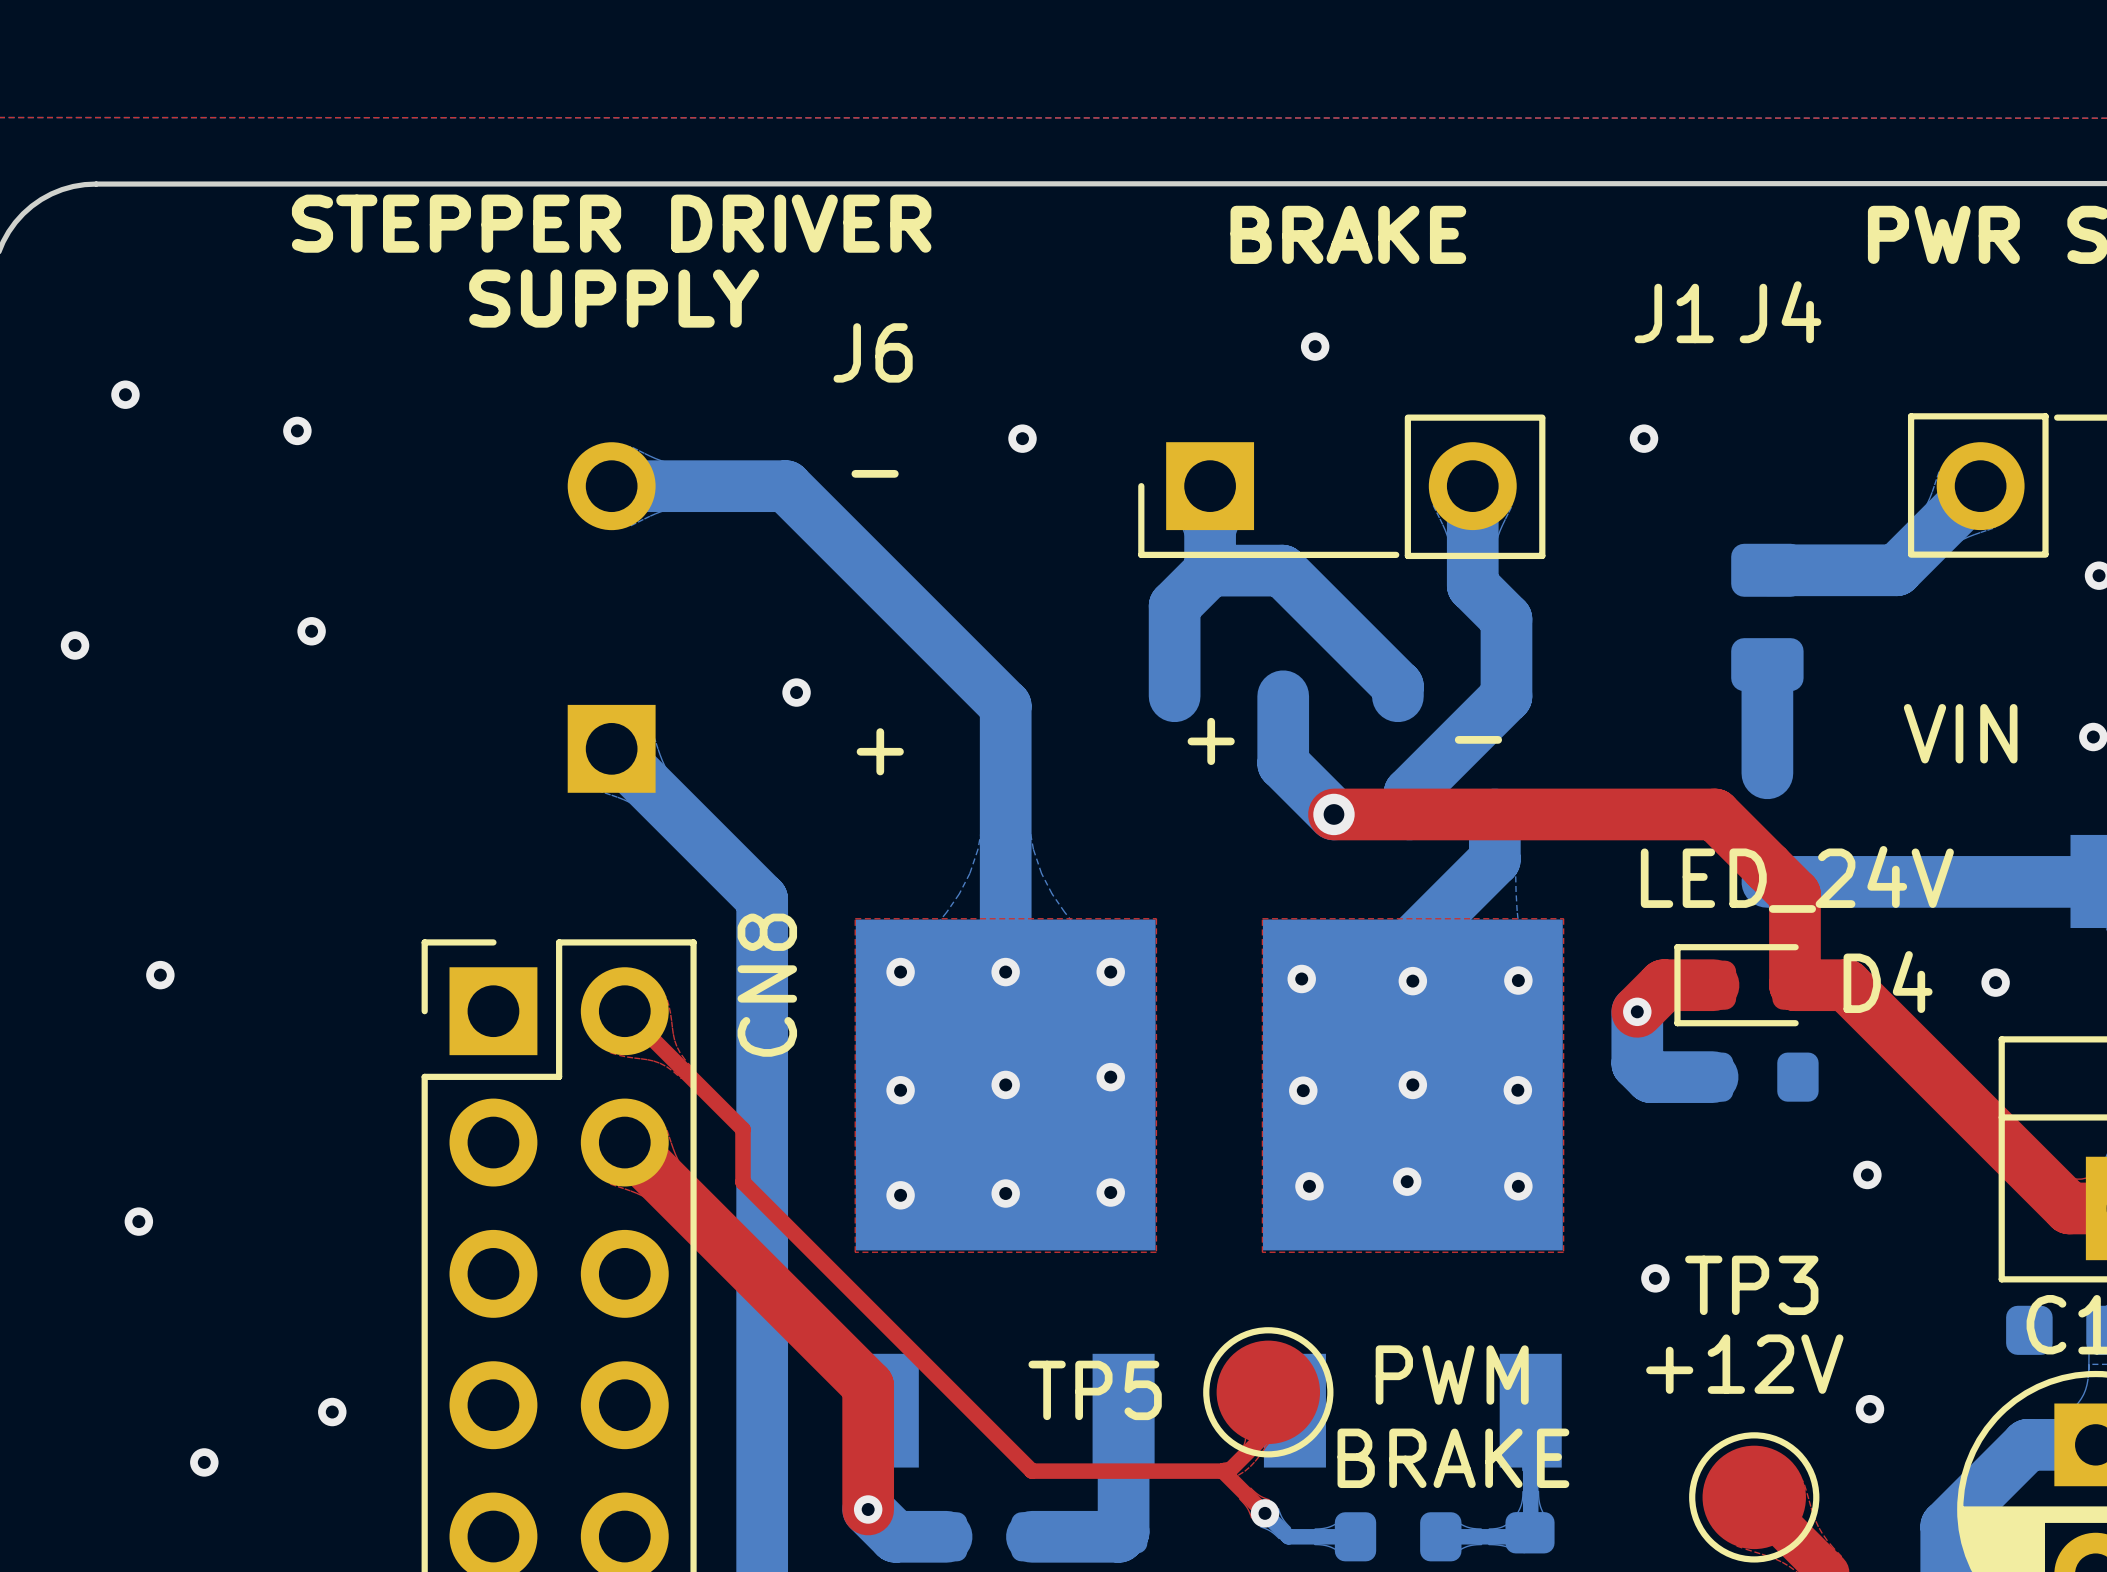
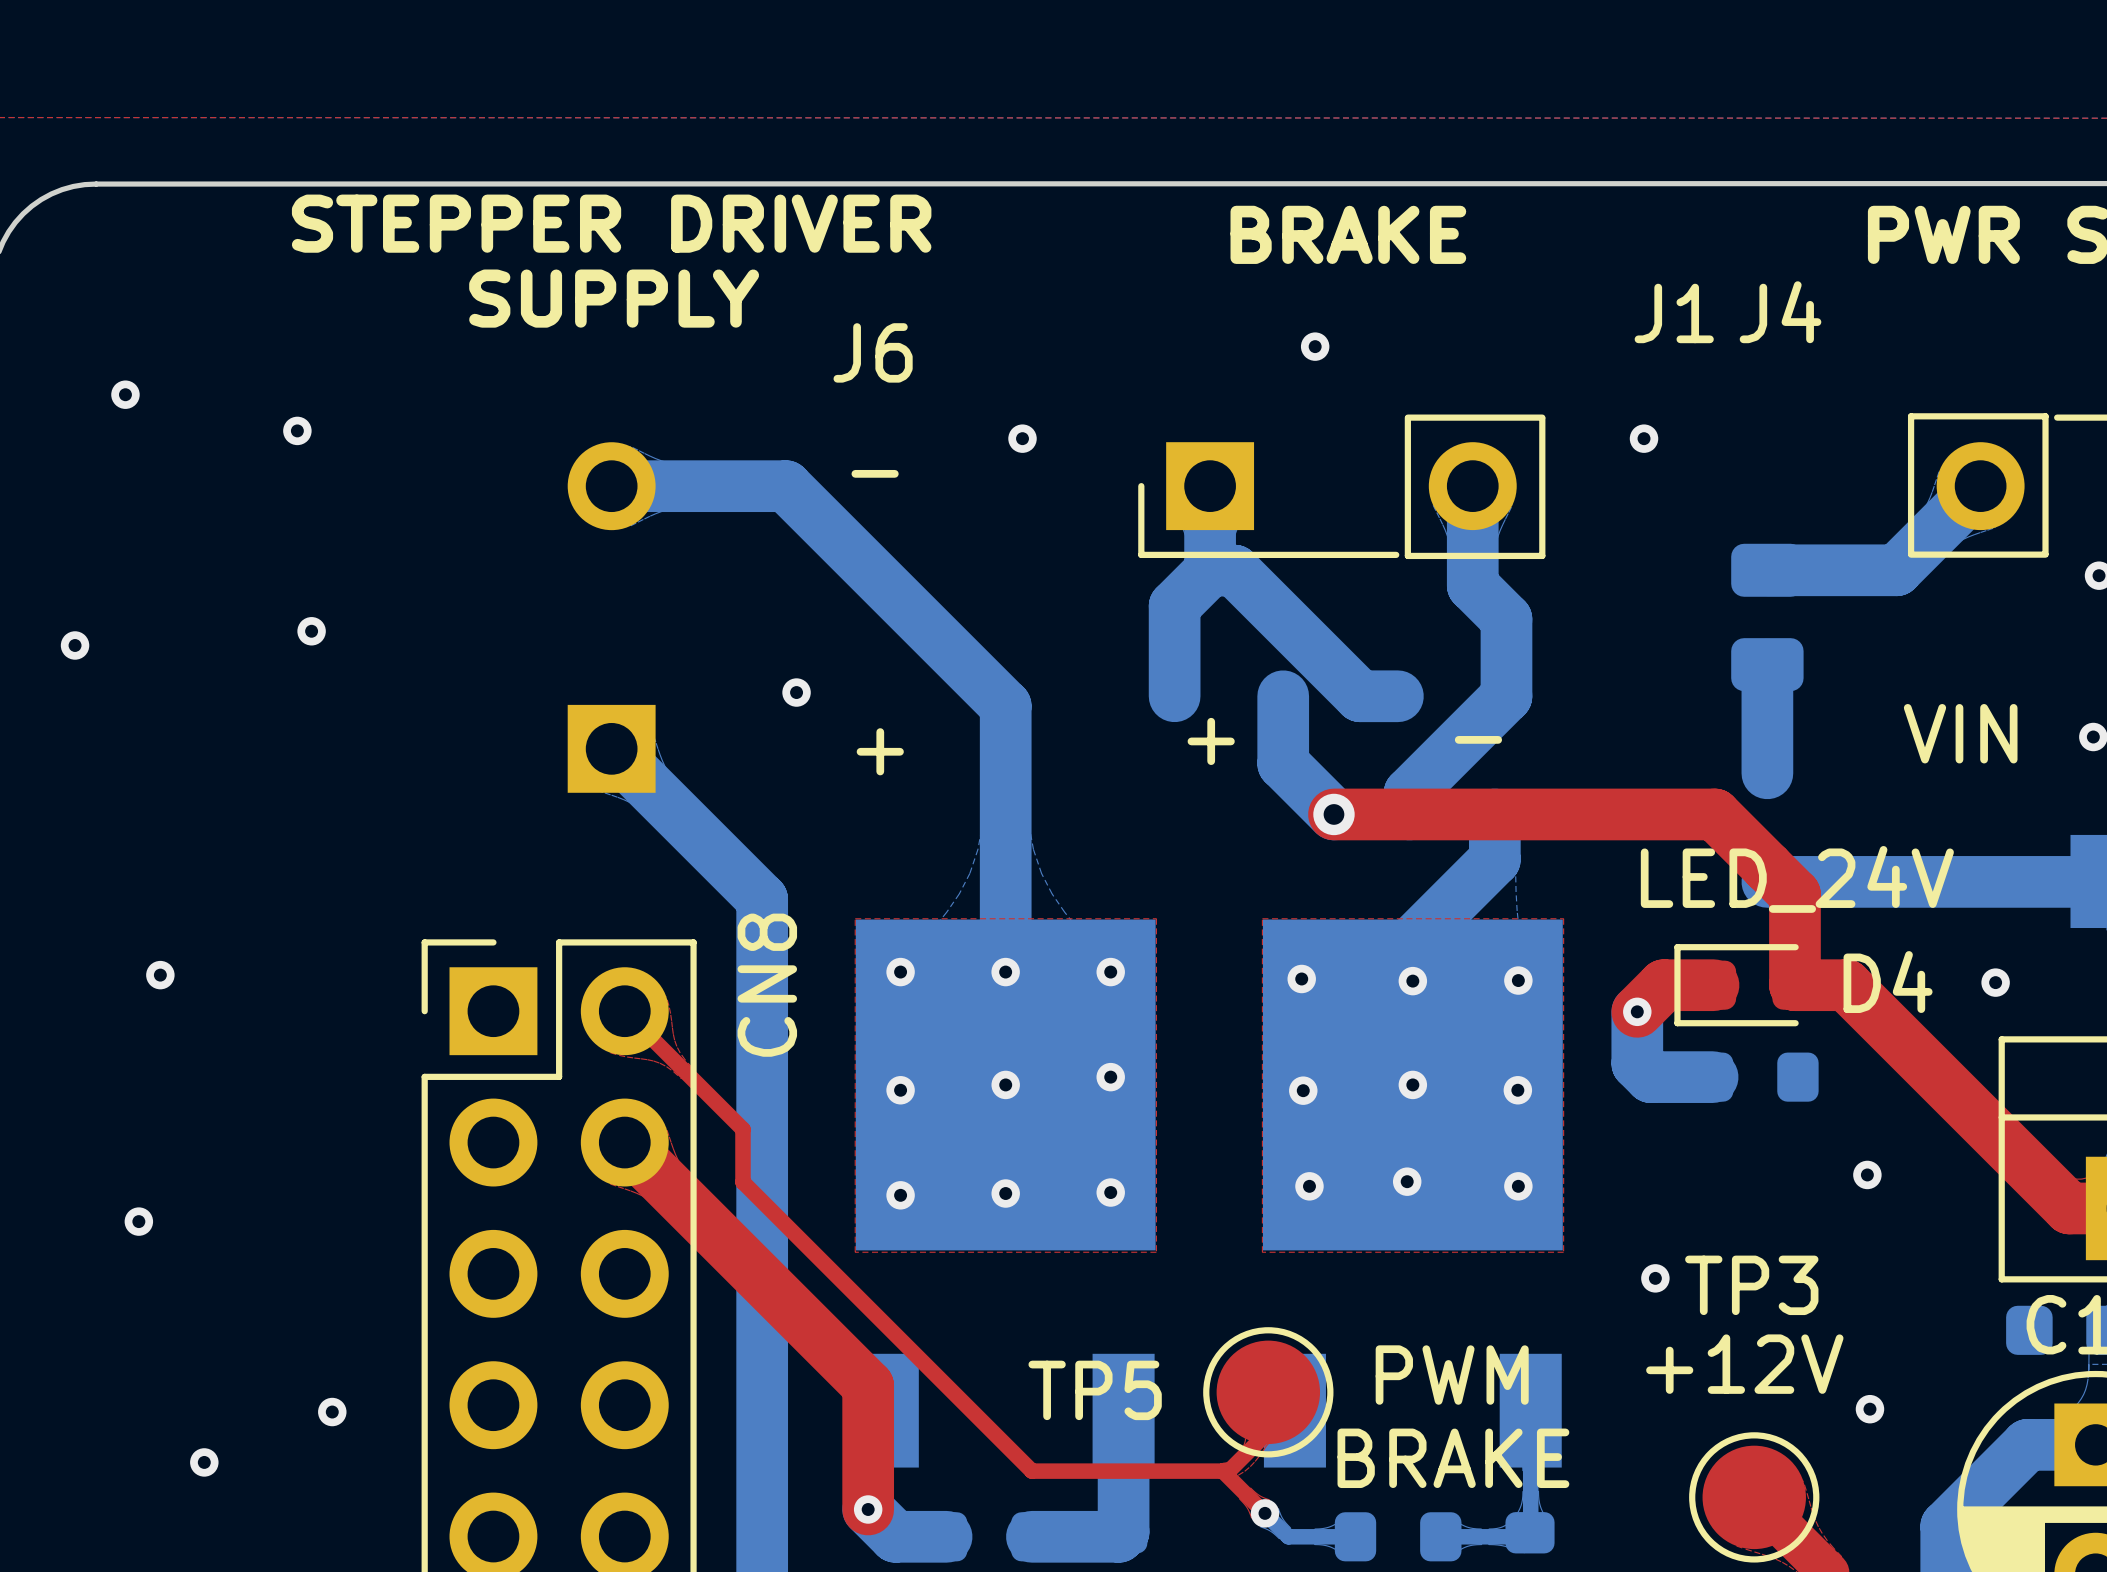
bottom track: (1234, 570) (1282, 570) (1397, 686) (1397, 696) -> (1234, 570) (1360, 696) (1397, 696)

